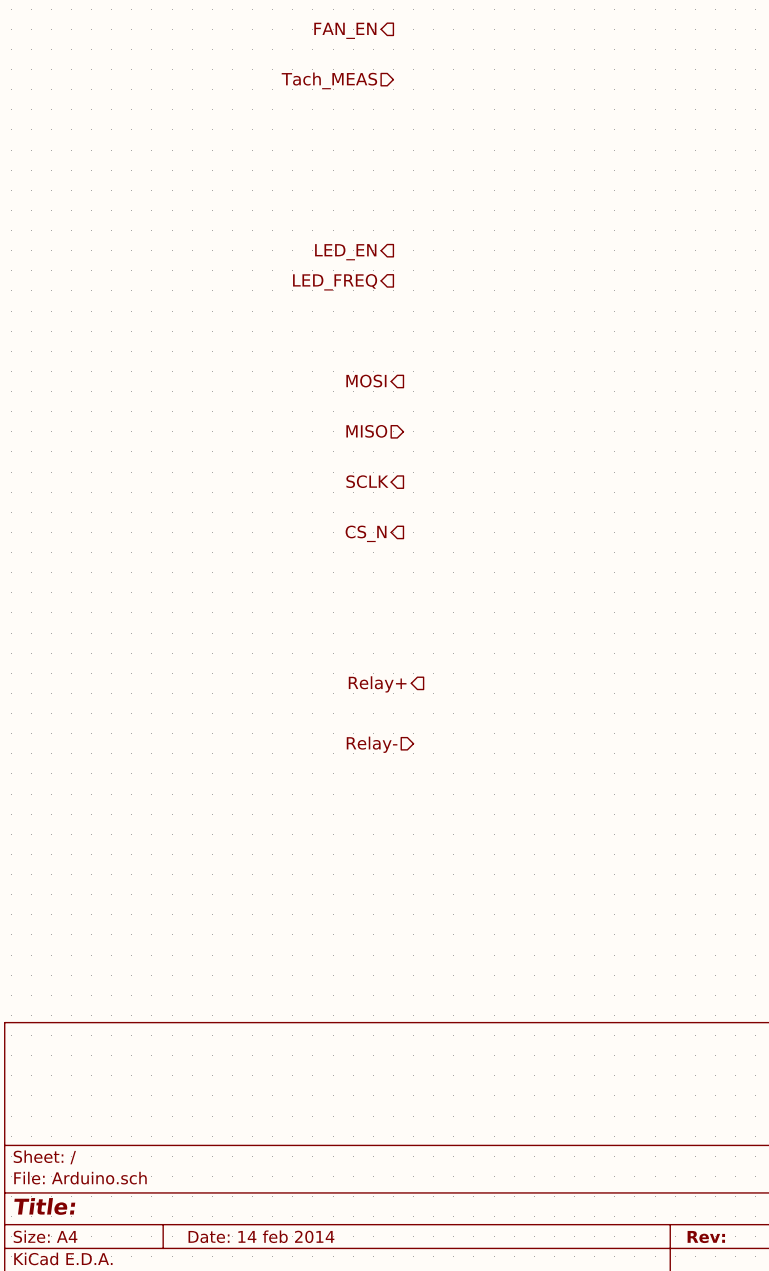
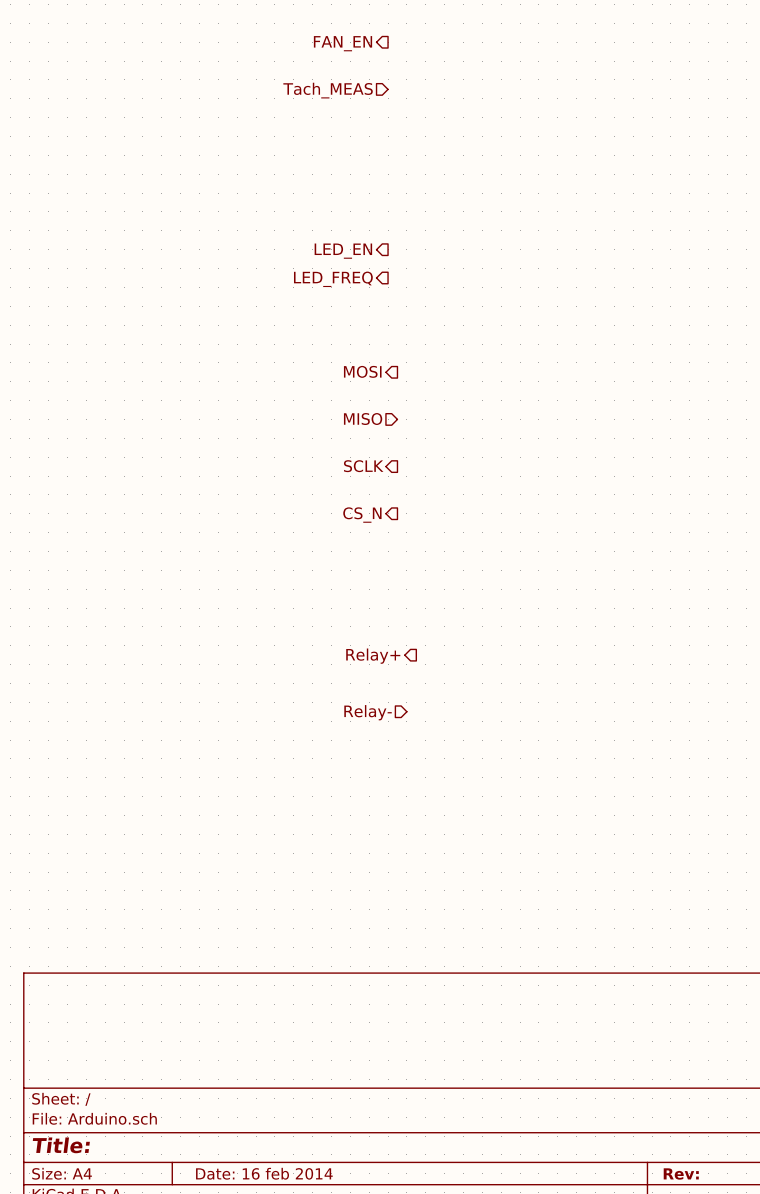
title block: Date: 14 feb 2014 (261, 1236) -> Date: 16 feb 2014 (264, 1173)

